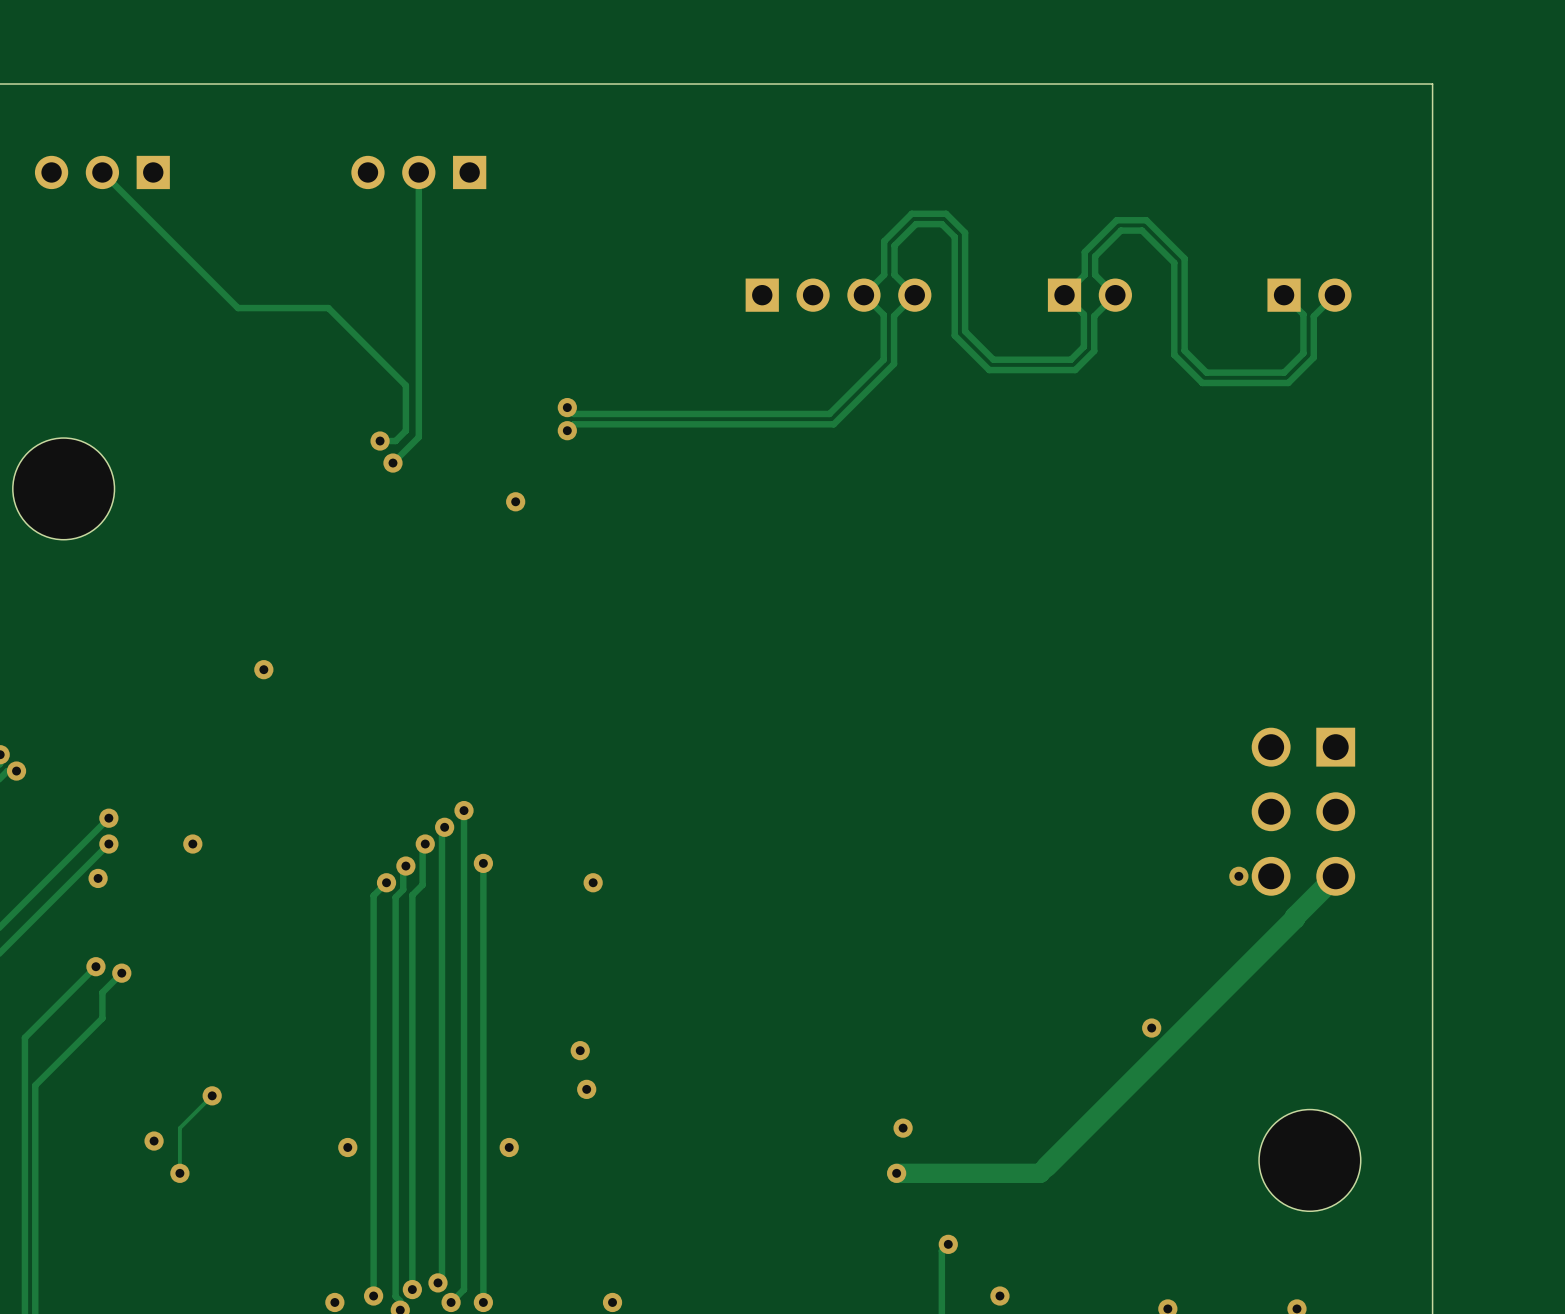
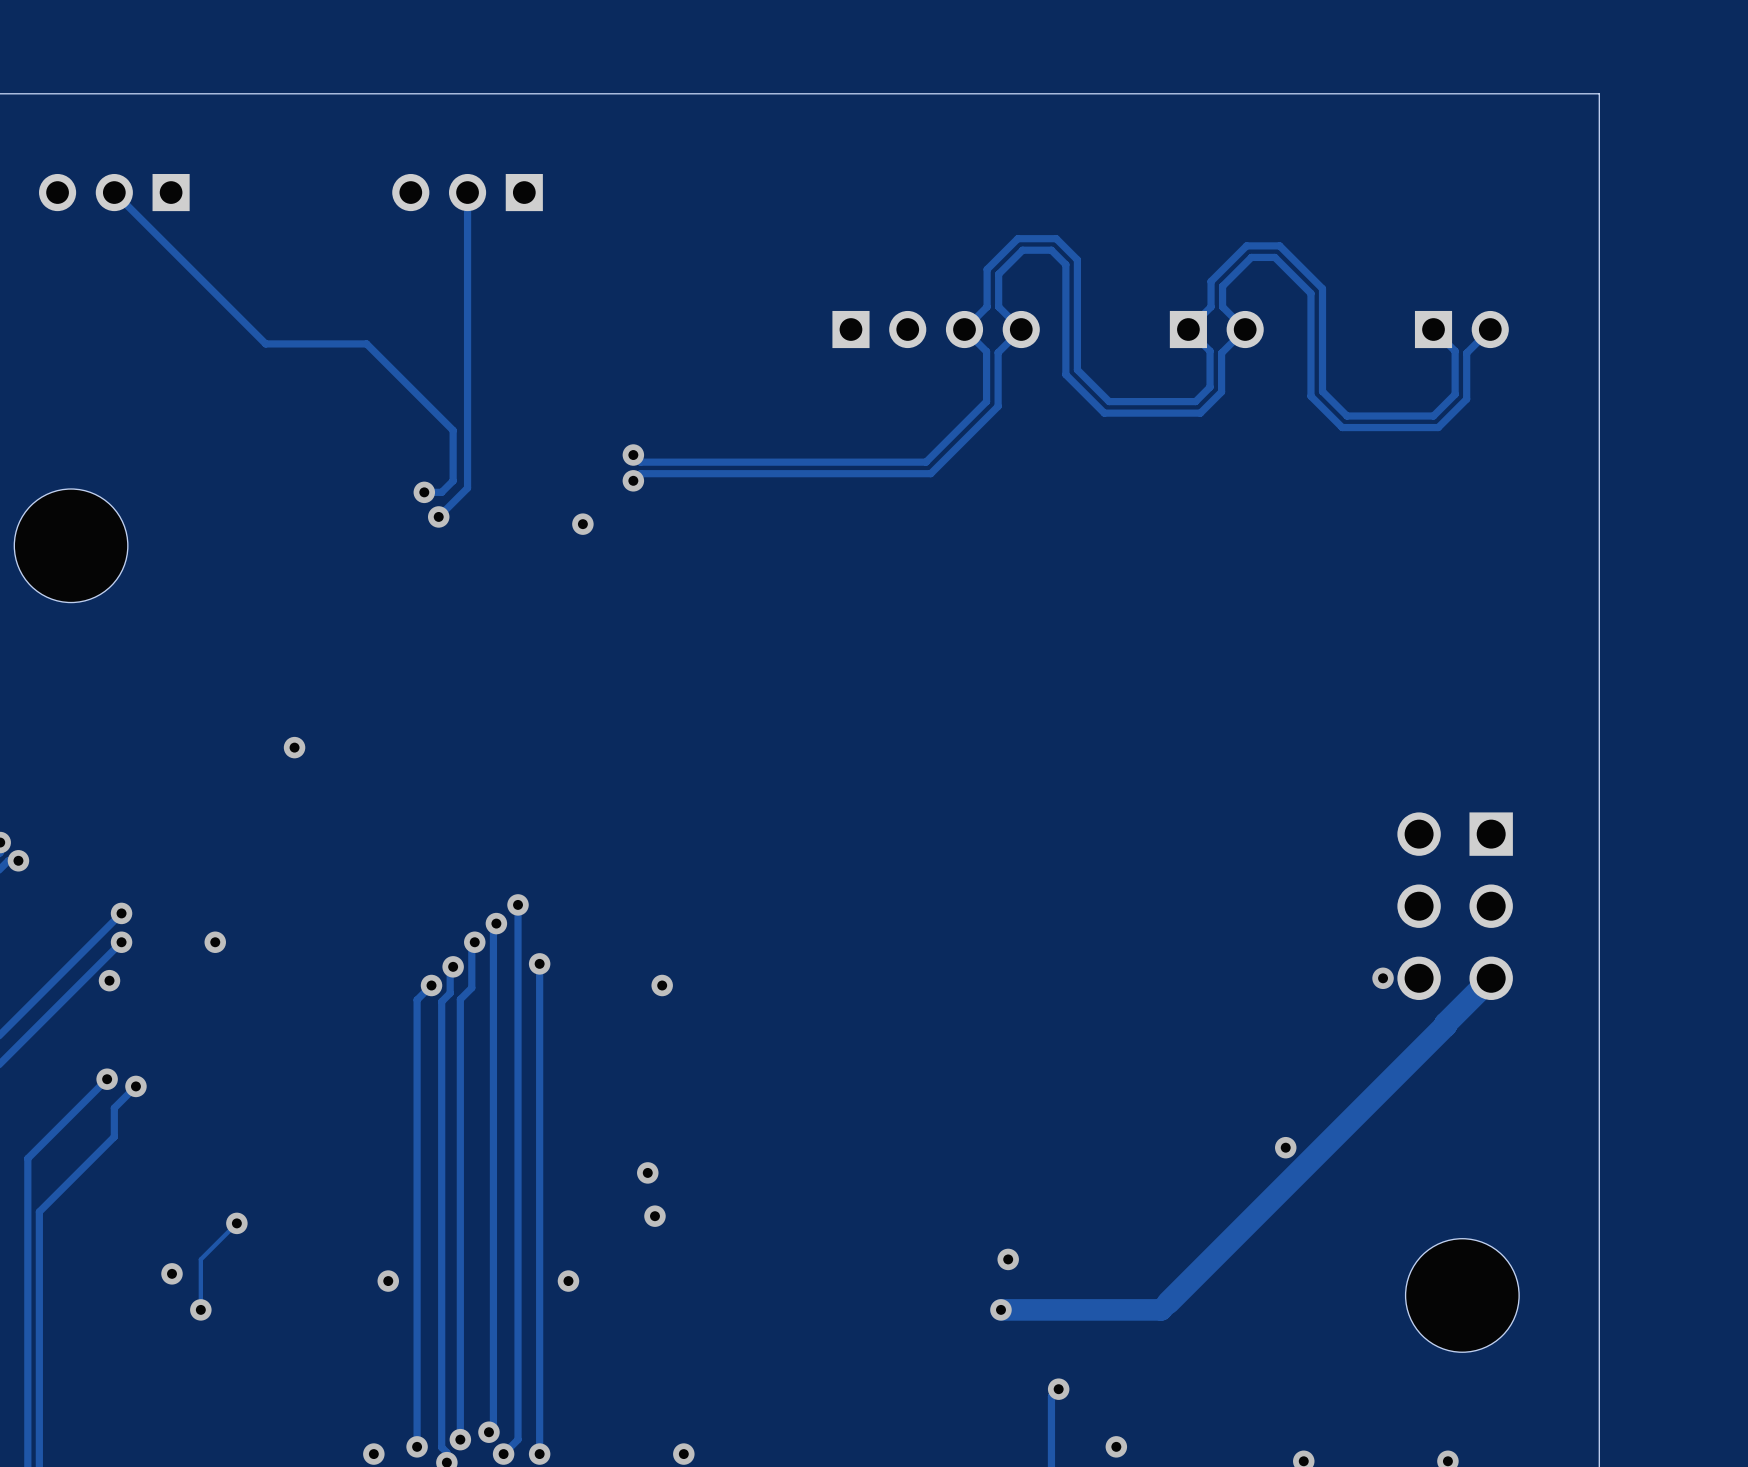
via position: (515, 501) -> (582, 524)

